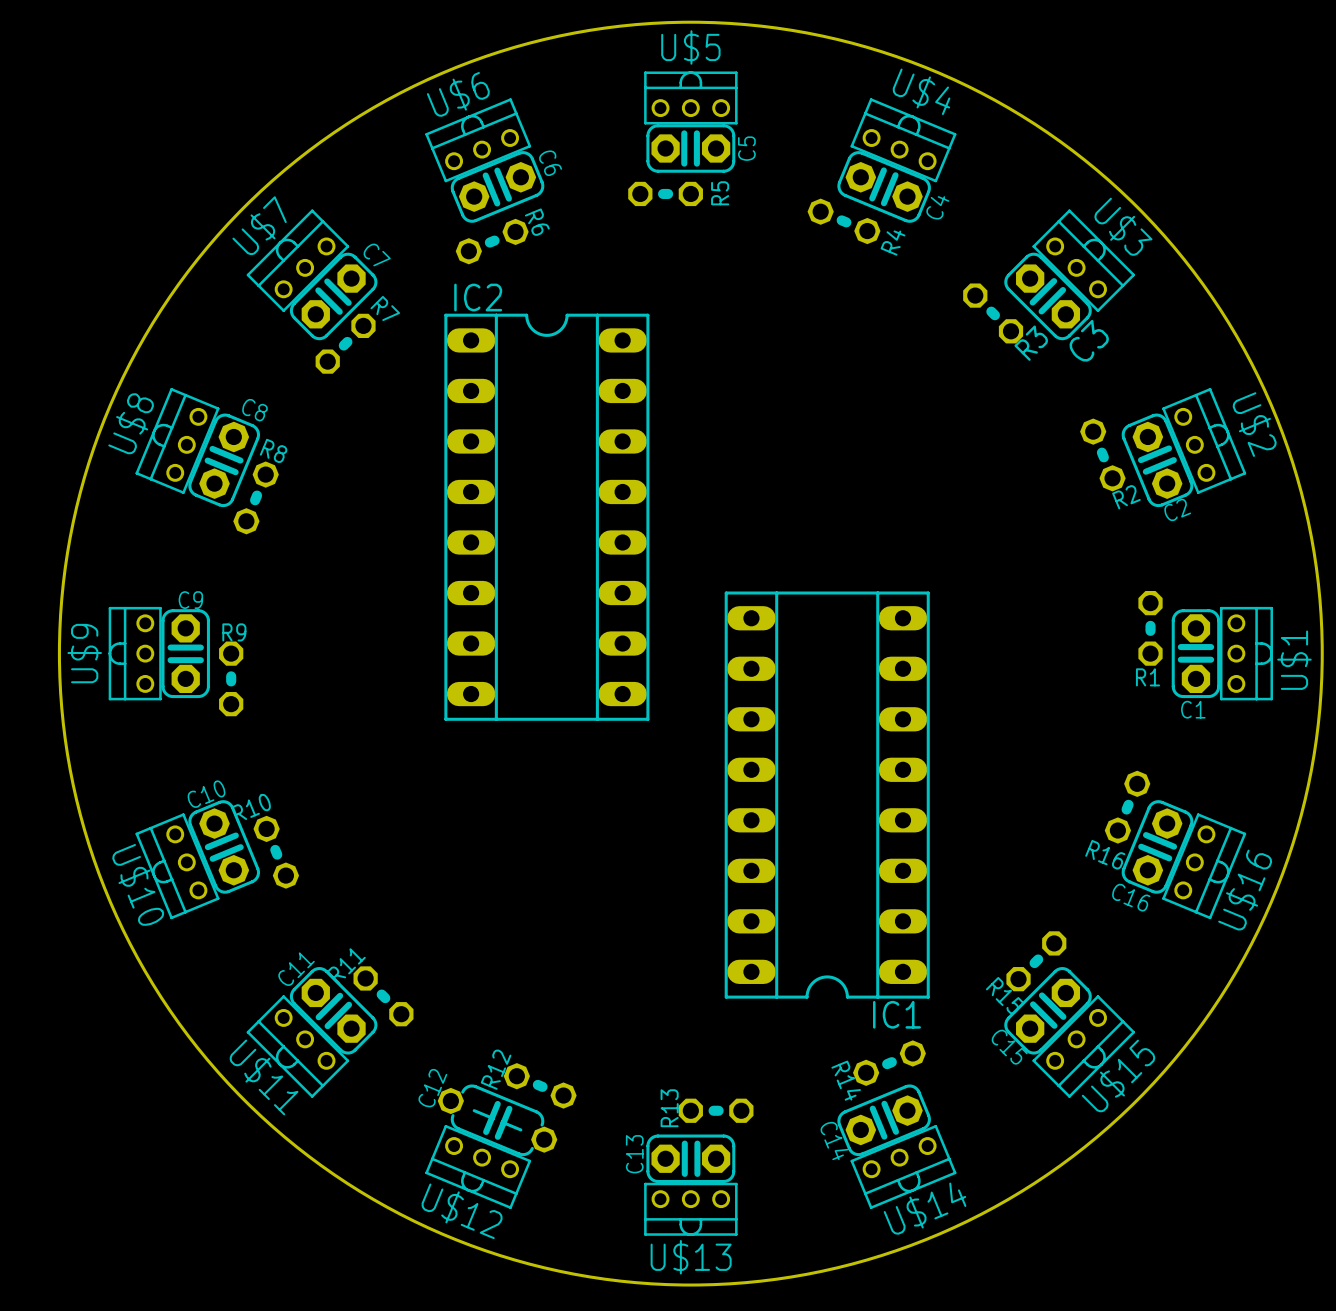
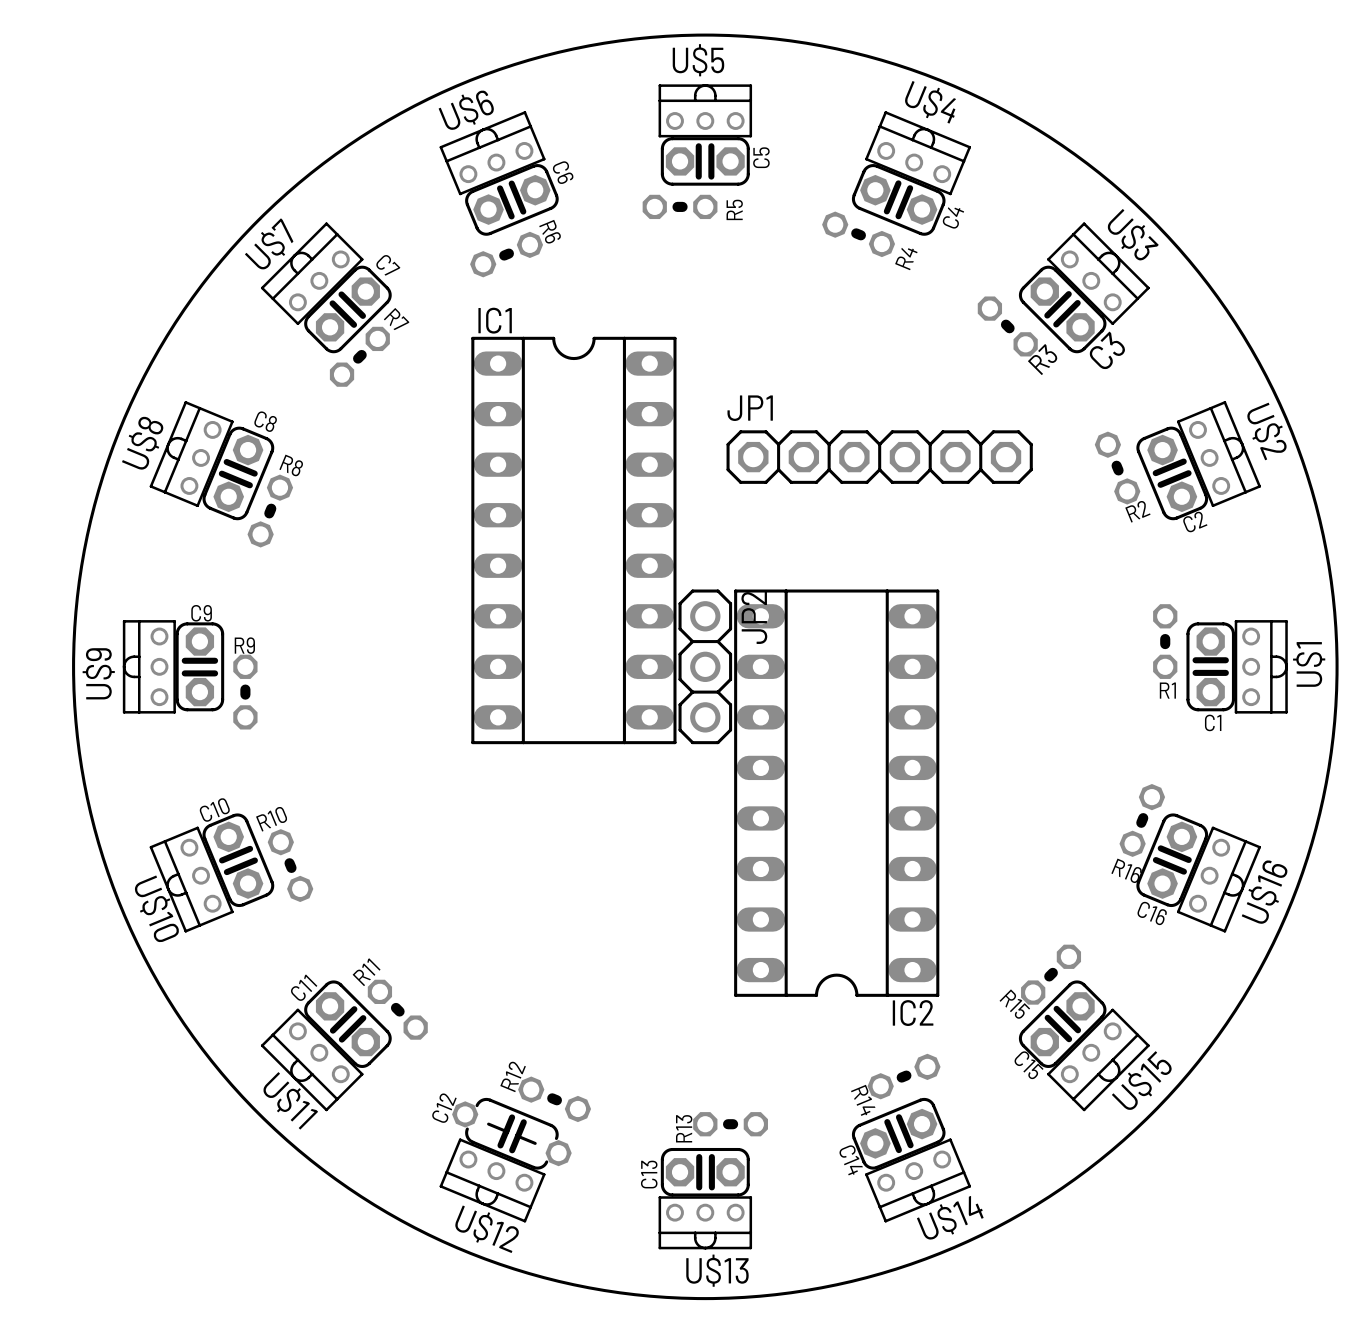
JP1: none -> (879, 457)
IC2 rotation: 0° (546, 517) -> 180° (836, 793)
IC2 position: (546, 517) -> (836, 793)
JP2: none -> (705, 666)
IC1 rotation: 0° (827, 795) -> 180° (573, 540)
IC1 position: (827, 795) -> (573, 540)

